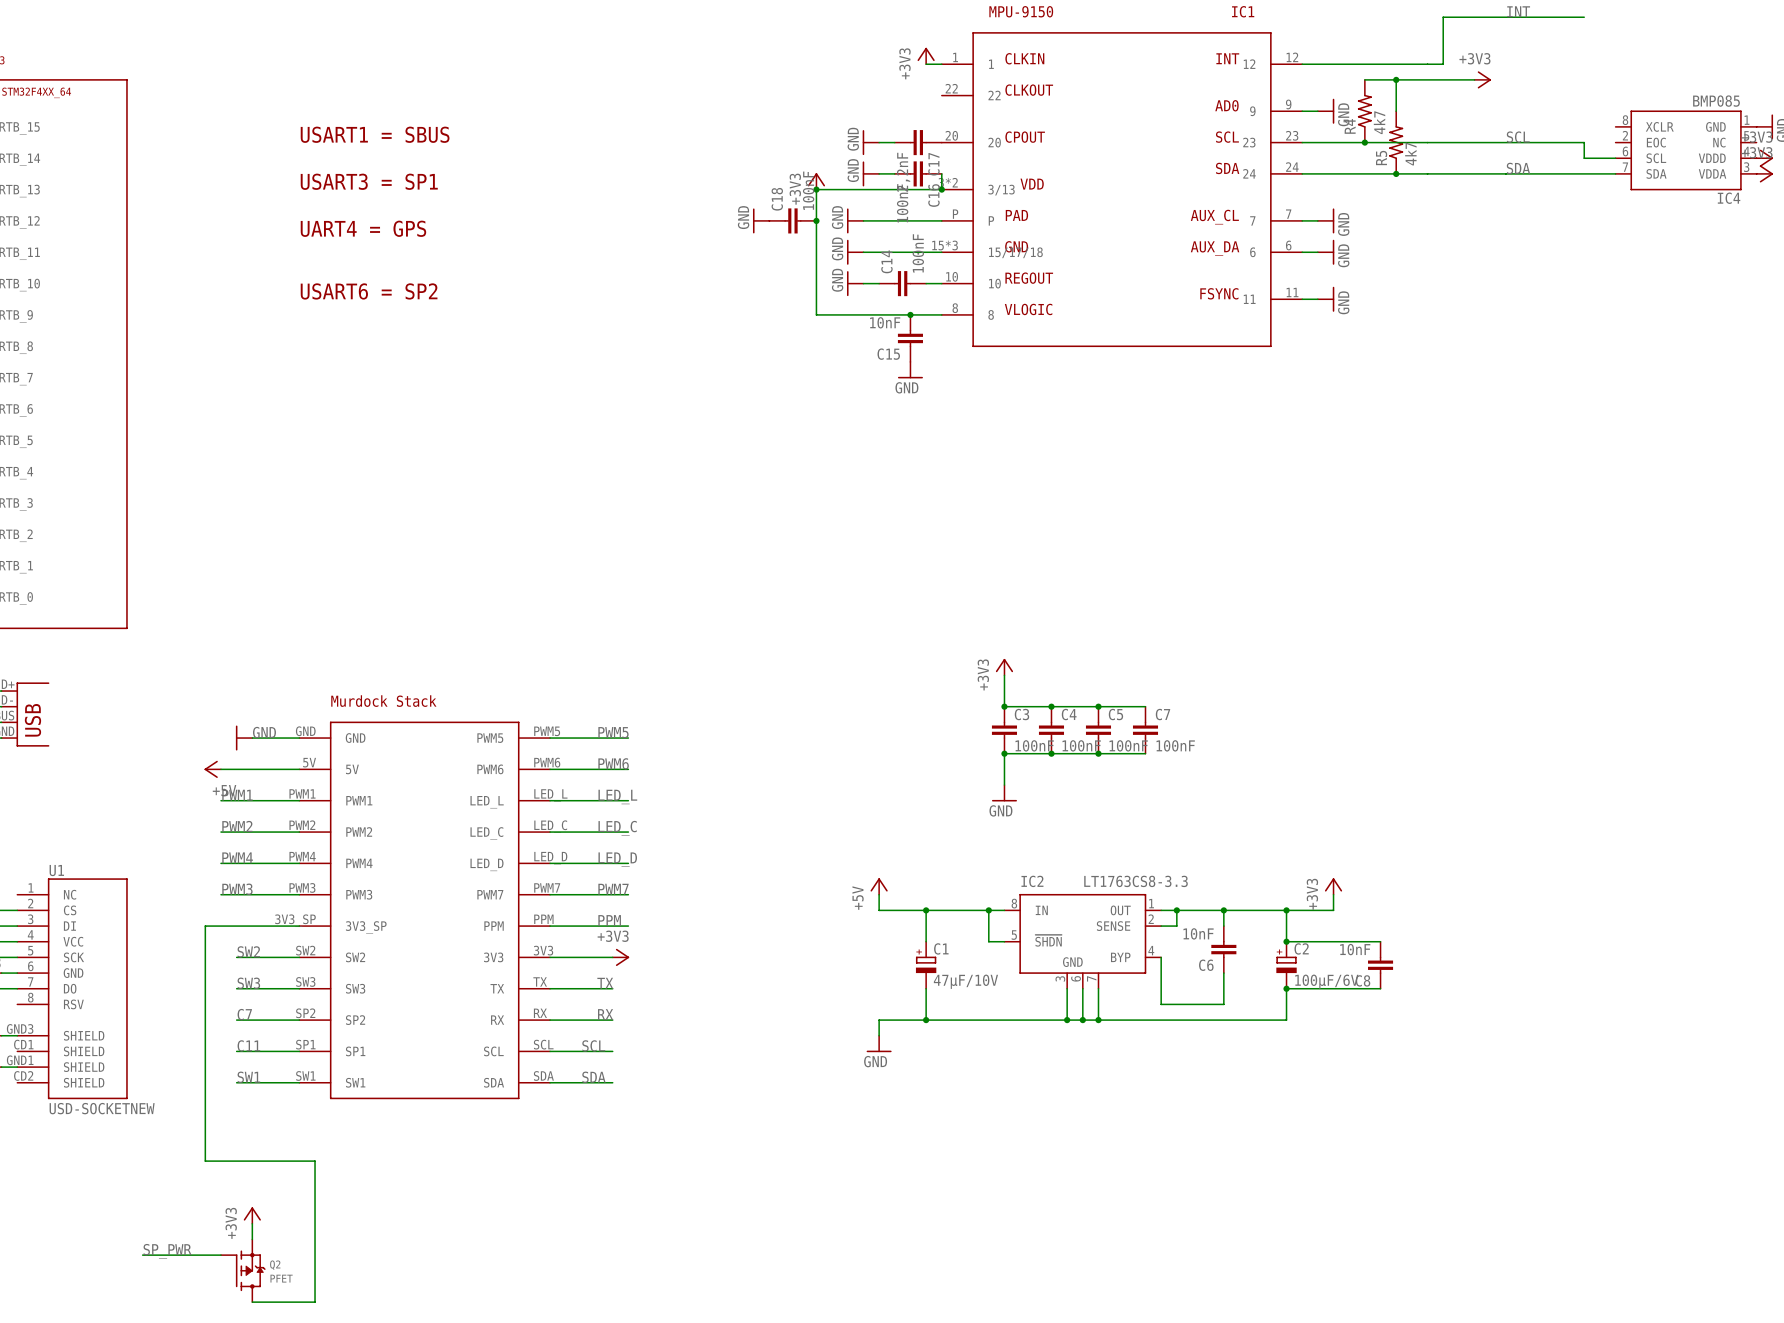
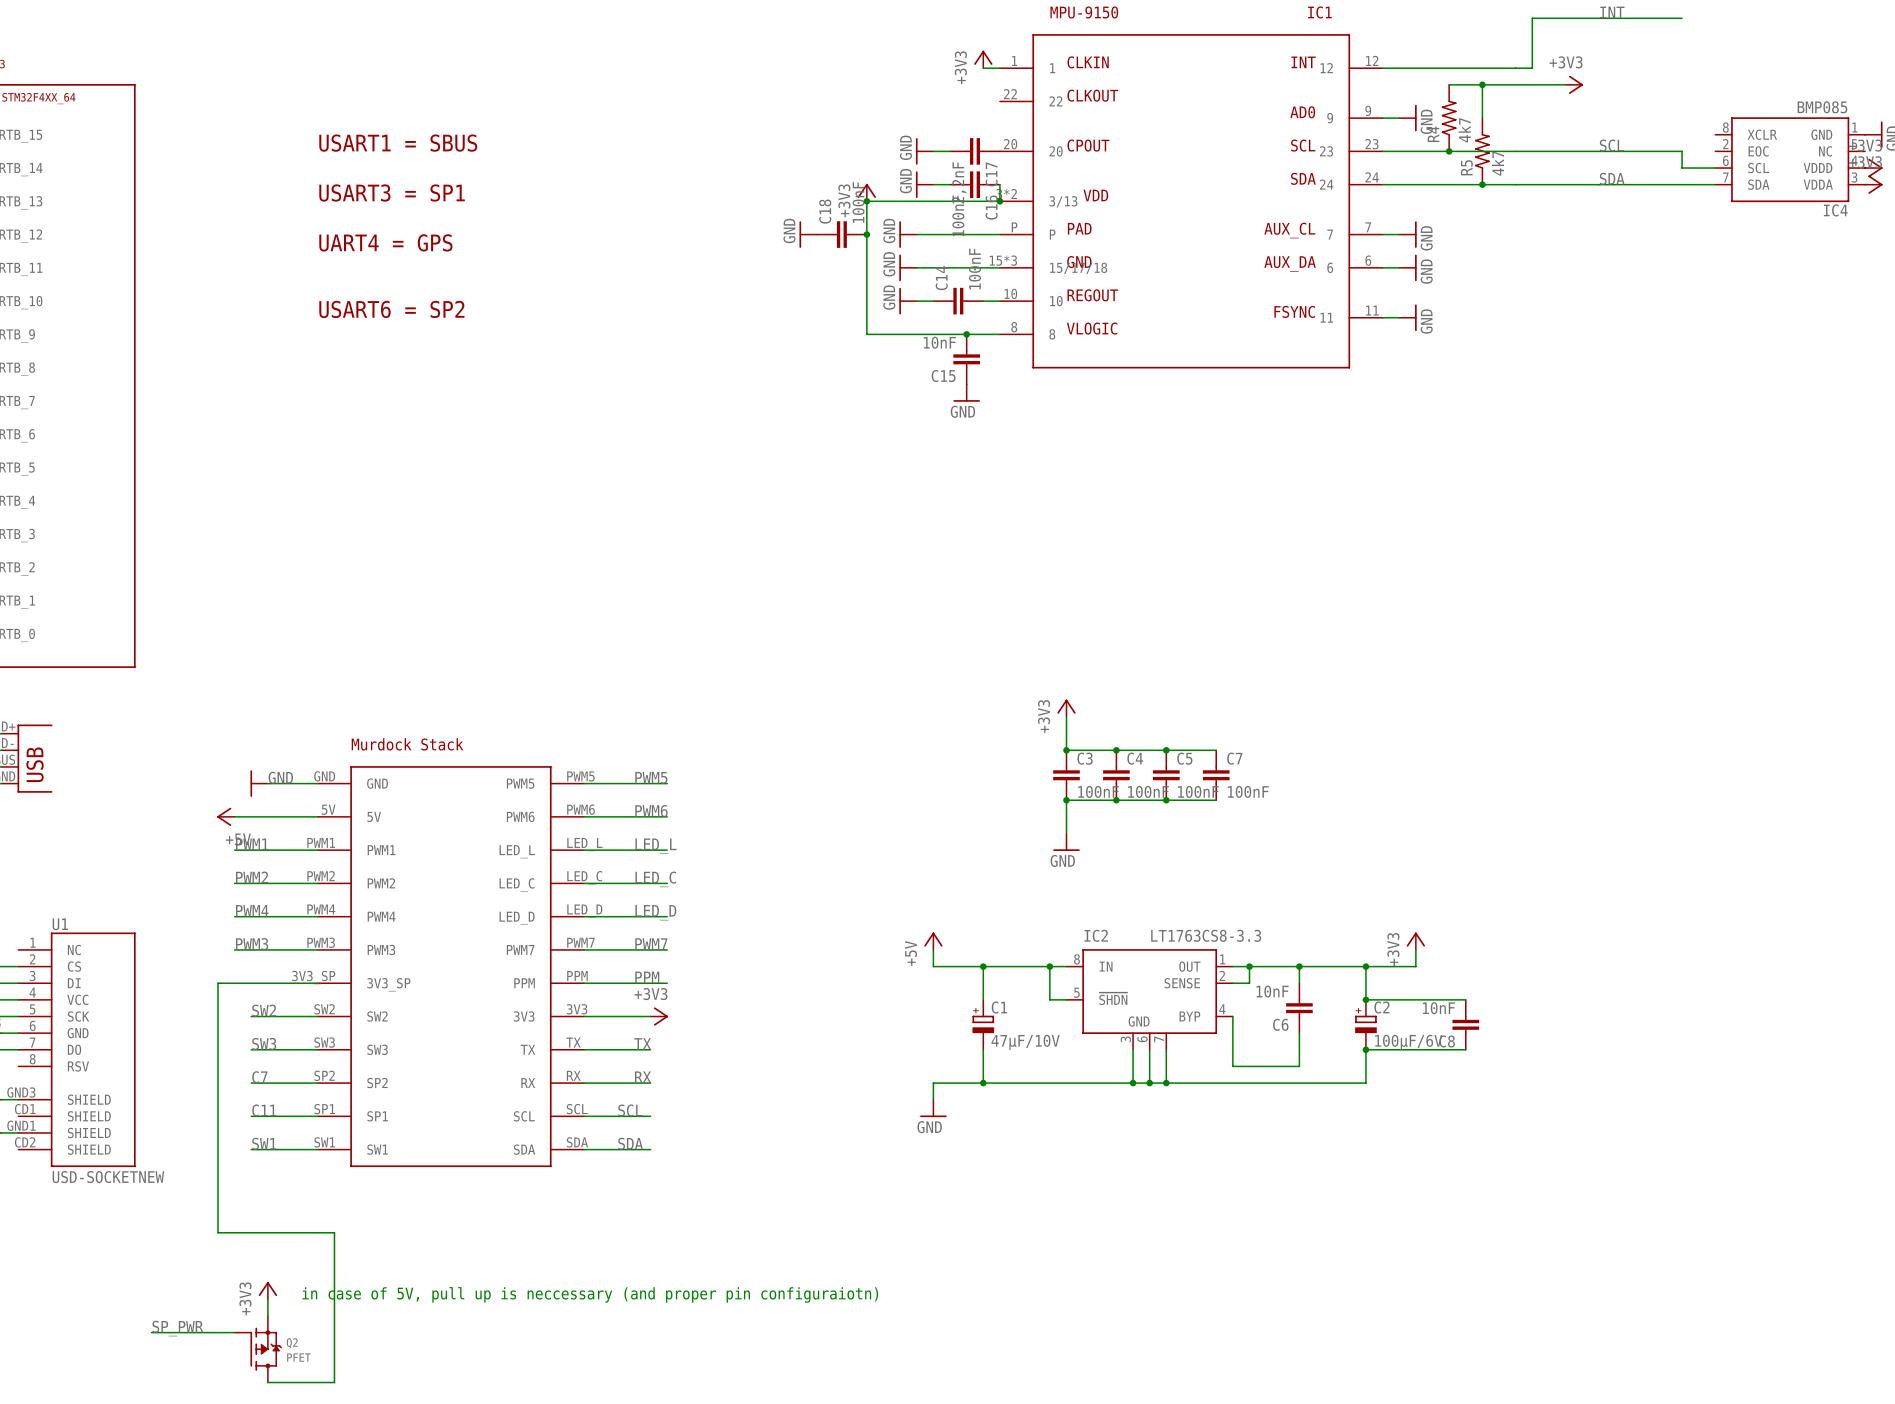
text: none -> in case of 5V, pull up is neccessary (and proper pin configuraiotn) (590, 1294)

